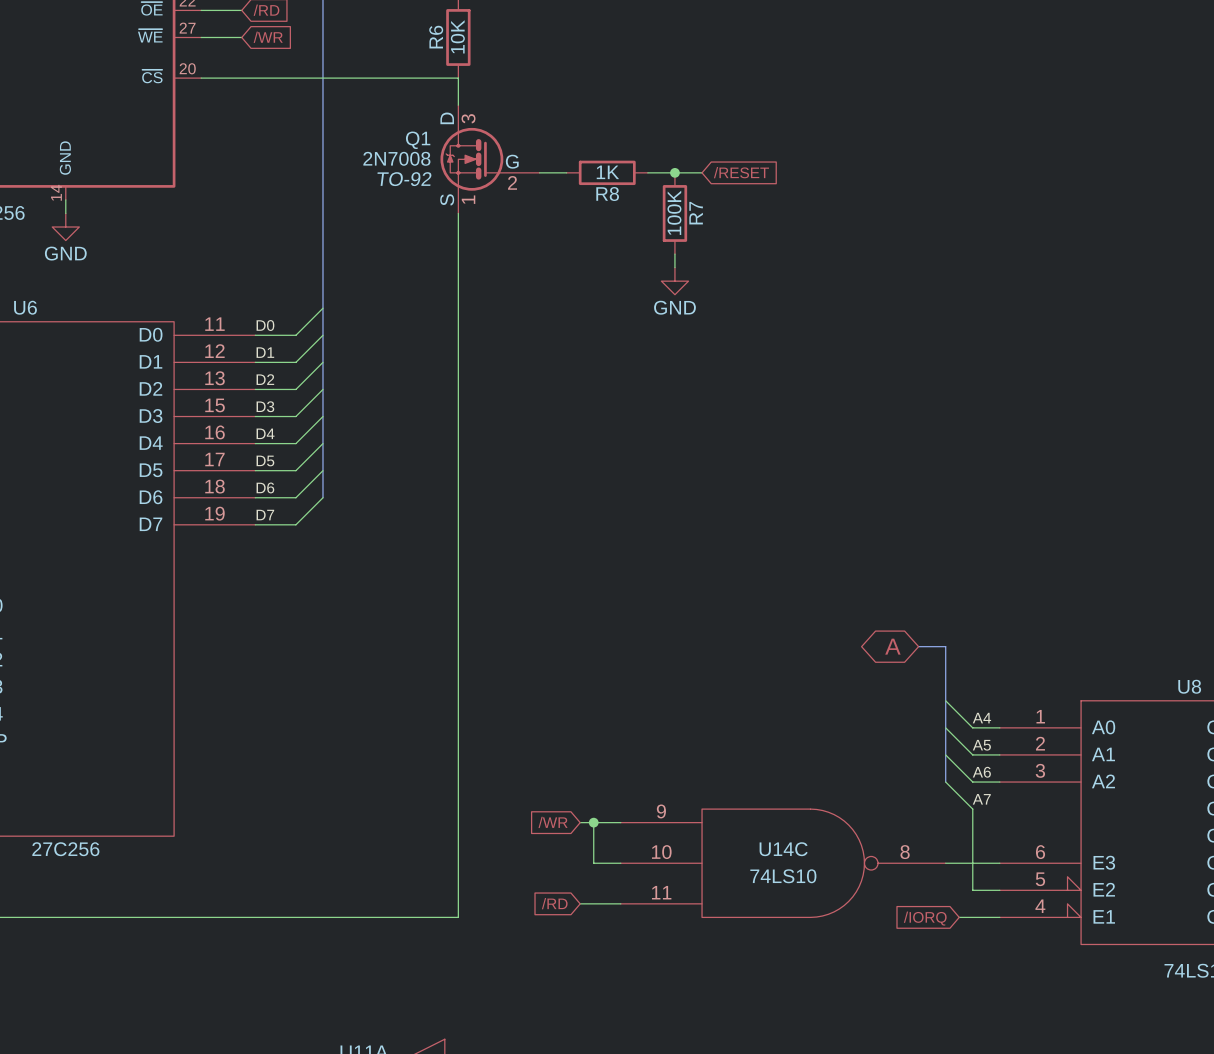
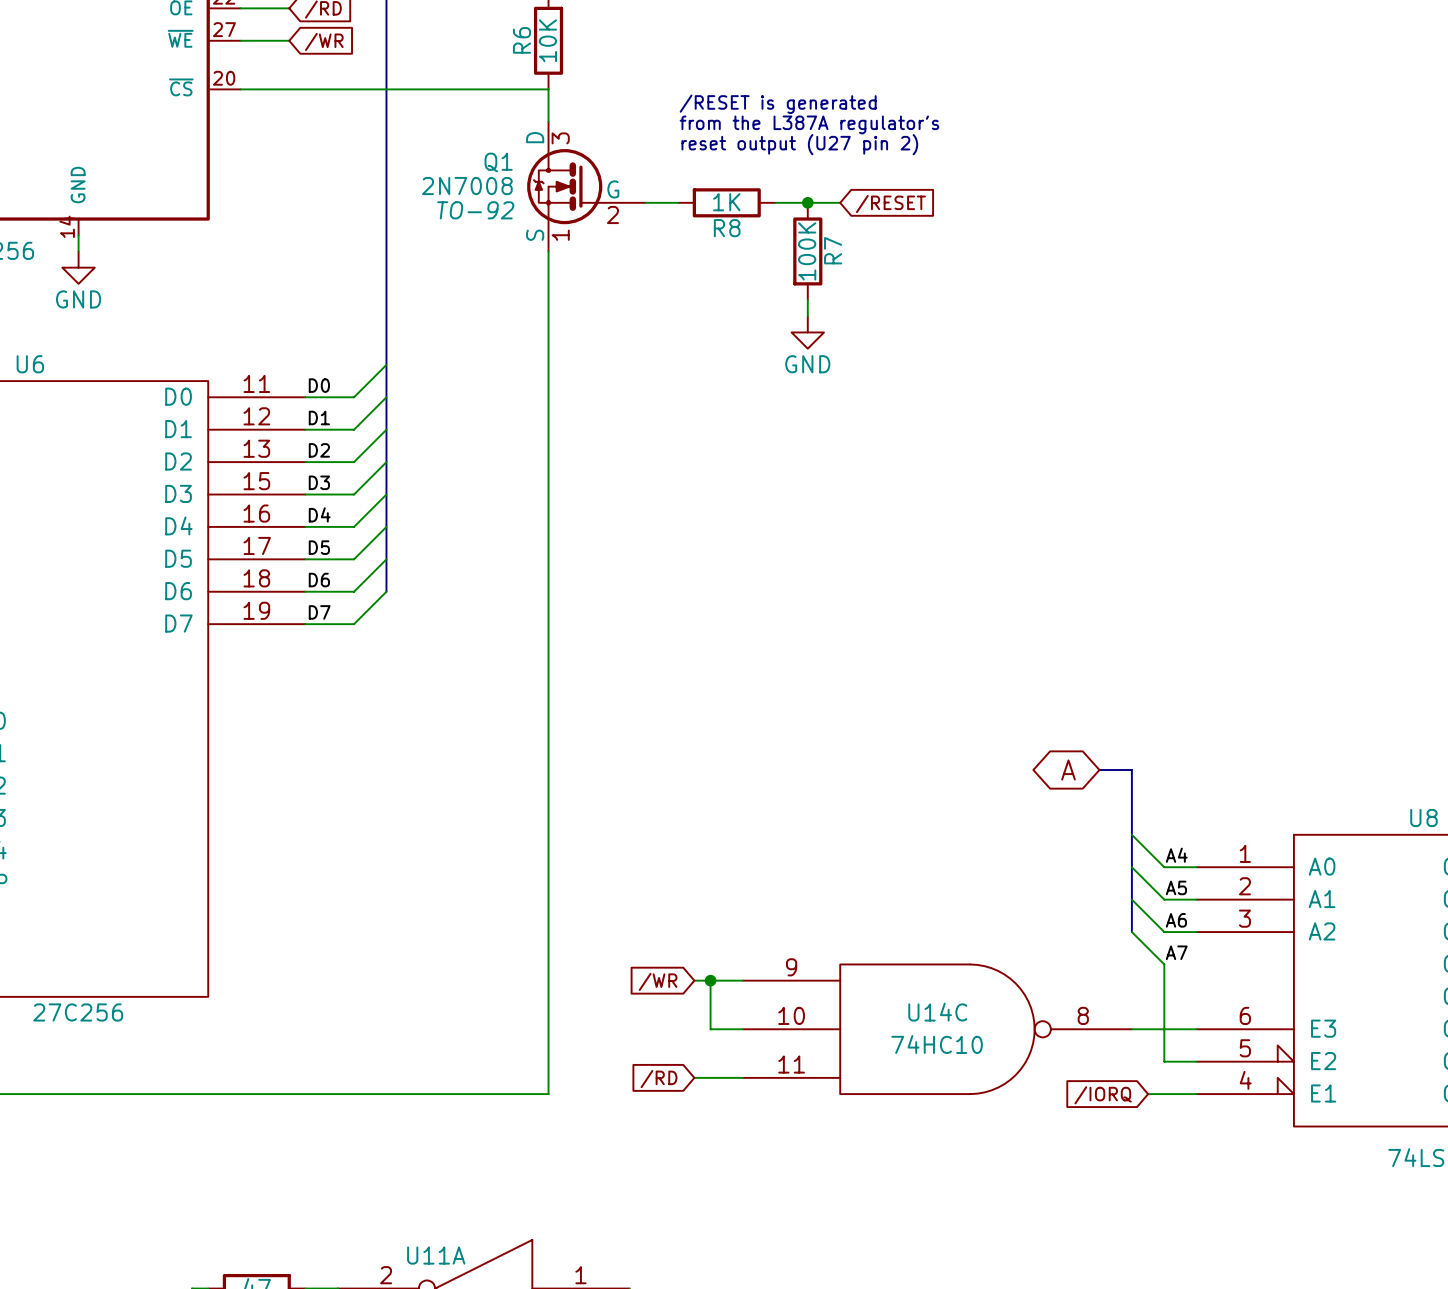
text: none -> /RESET is generated (778, 104)
text: none -> from the L387A regulator's (809, 124)
text: none -> reset output (U27 pin 2) (799, 144)
U14C value: 74LS10 (783, 876) -> 74HC10 (937, 1044)

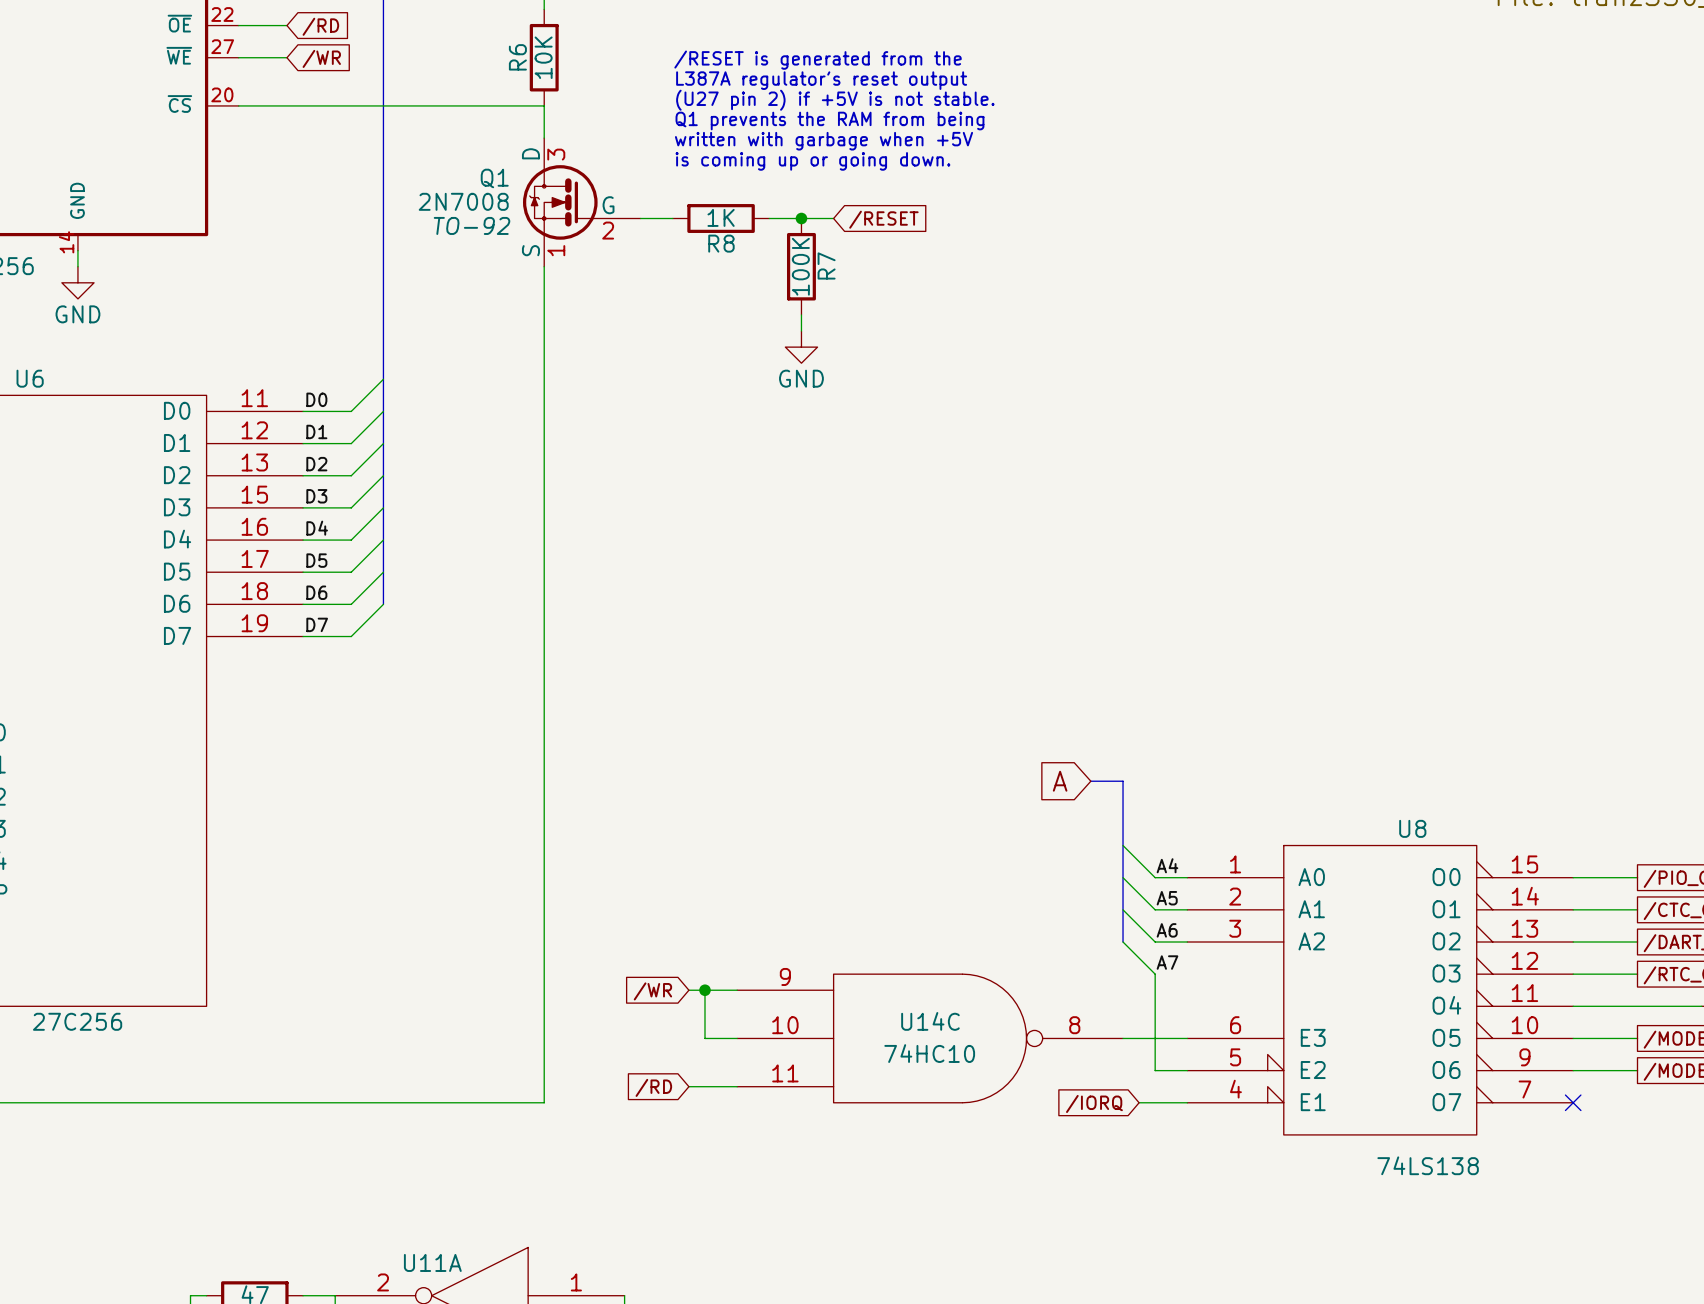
text: none -> /RESET is generated from the (818, 60)
text: none -> L387A regulator's reset output (821, 80)
text: none -> (U27 pin 2) if +5V is not stable. (835, 100)
text: /RESET is generated (778, 104) -> Q1 prevents the RAM from being (829, 121)
text: from the L387A regulator's (809, 124) -> written with garbage when +5V (824, 141)
text: reset output (U27 pin 2) (799, 144) -> is coming up or going down. (812, 161)
global label shape: bidirectional (1068, 770) -> input (1060, 781)

